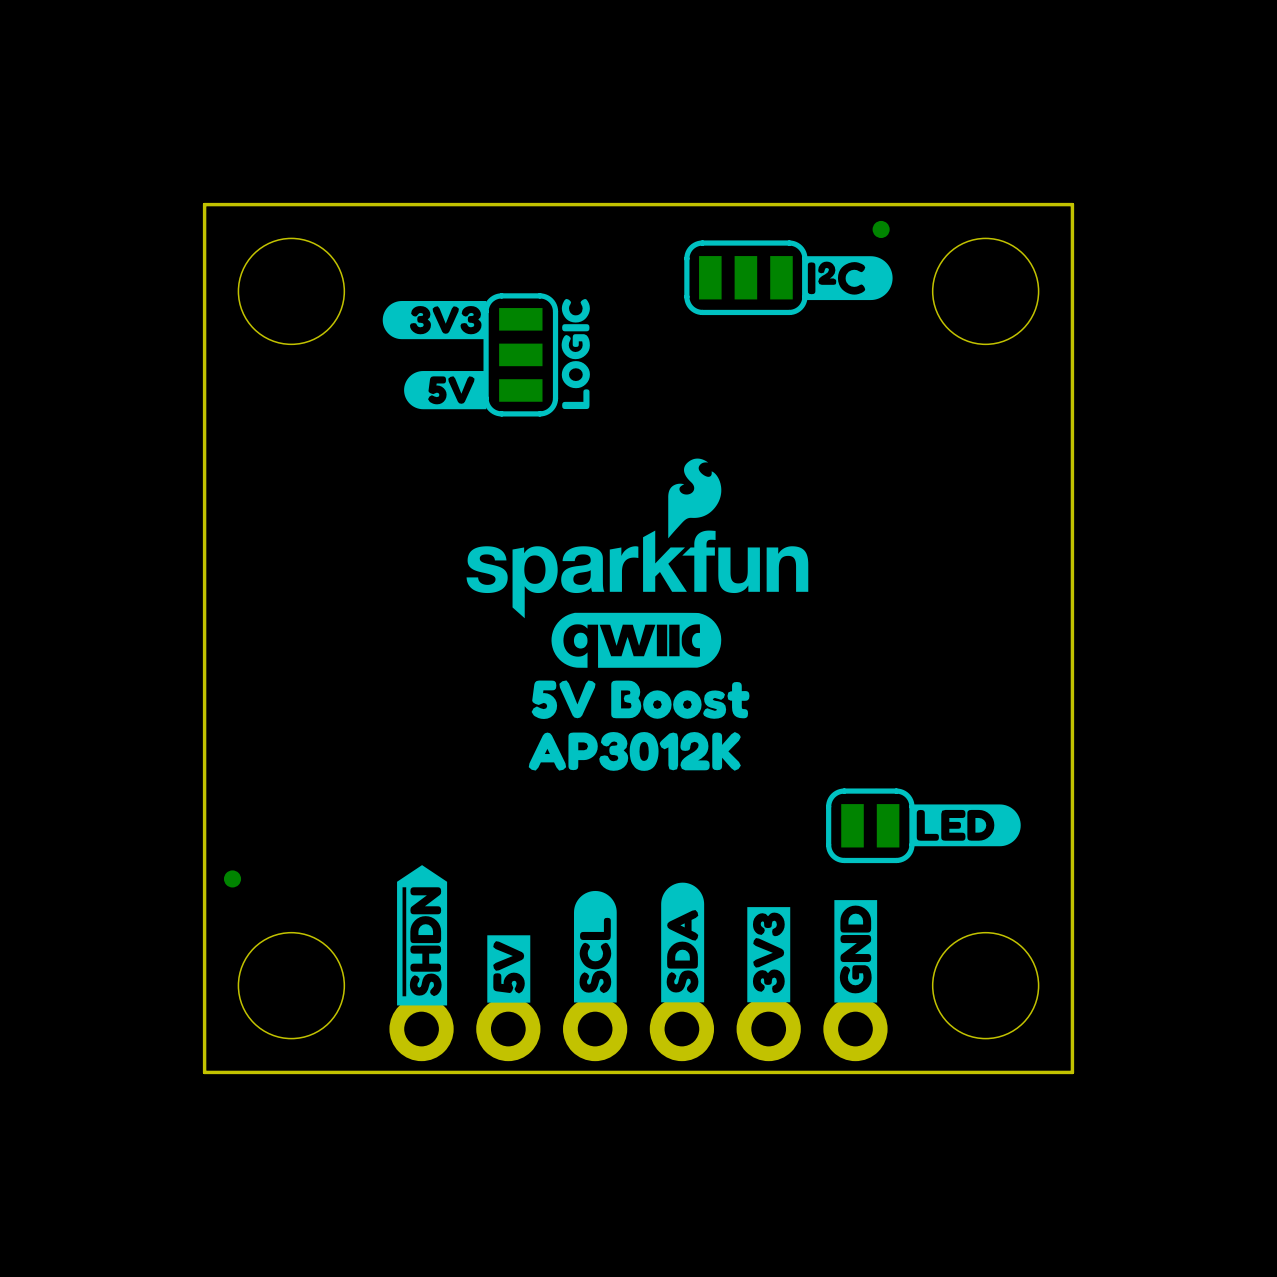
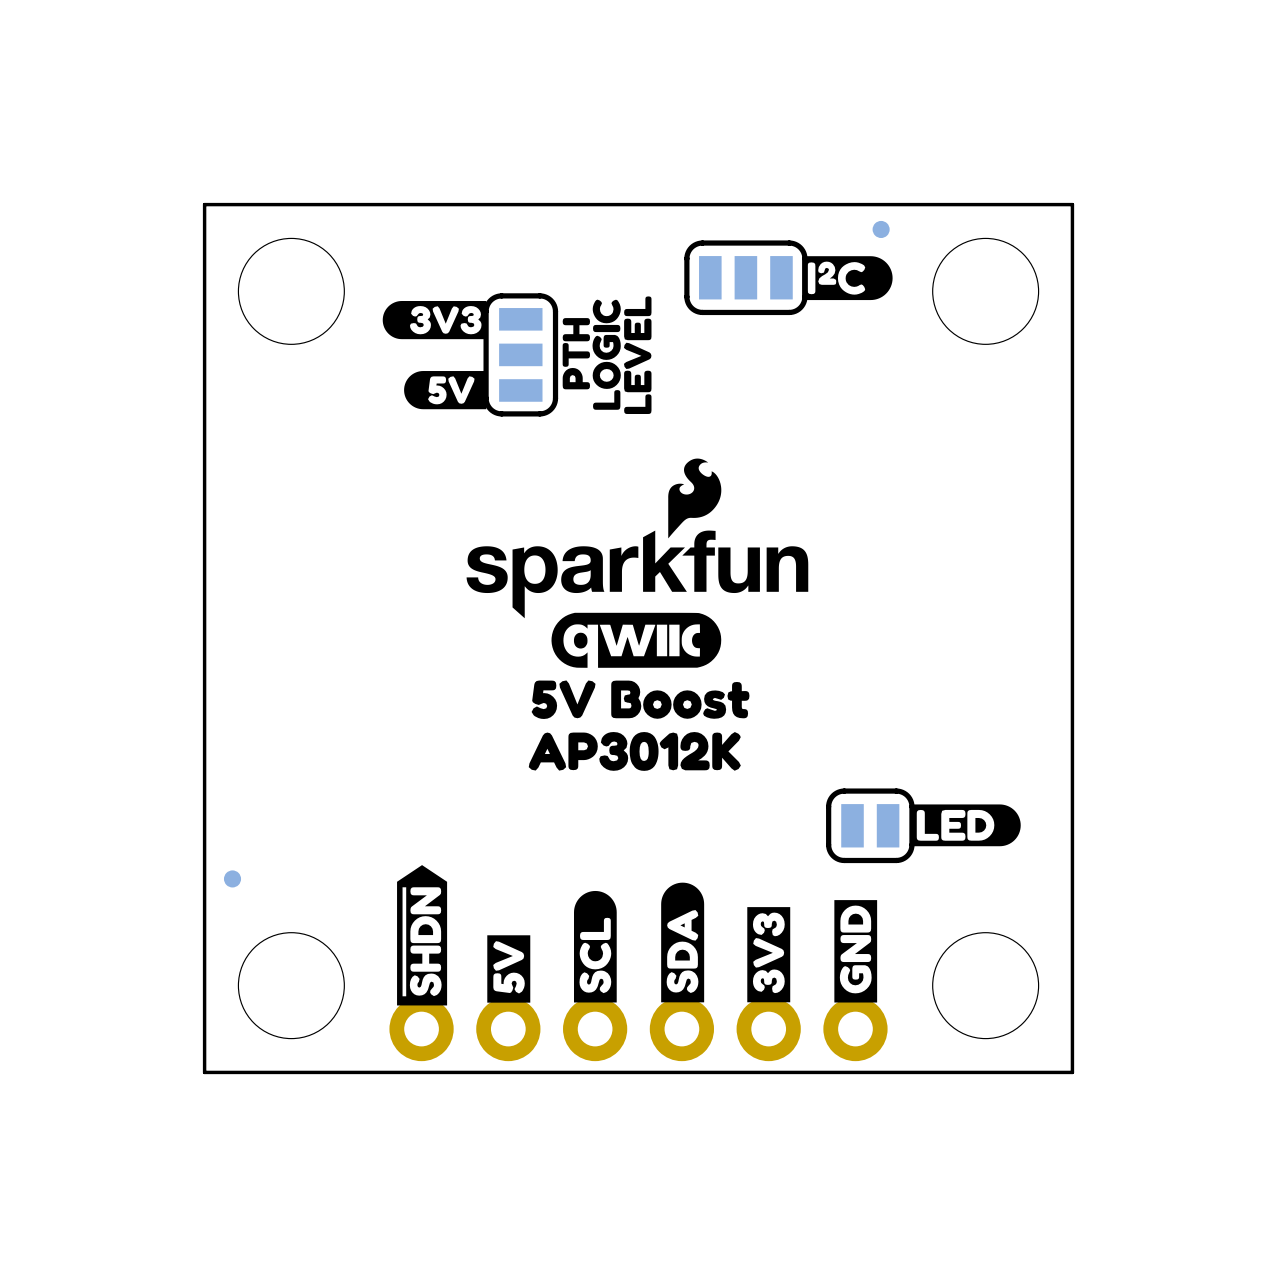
drawing: none -> [562, 296, 652, 414]
drawing position: (575, 353) -> (606, 354)

